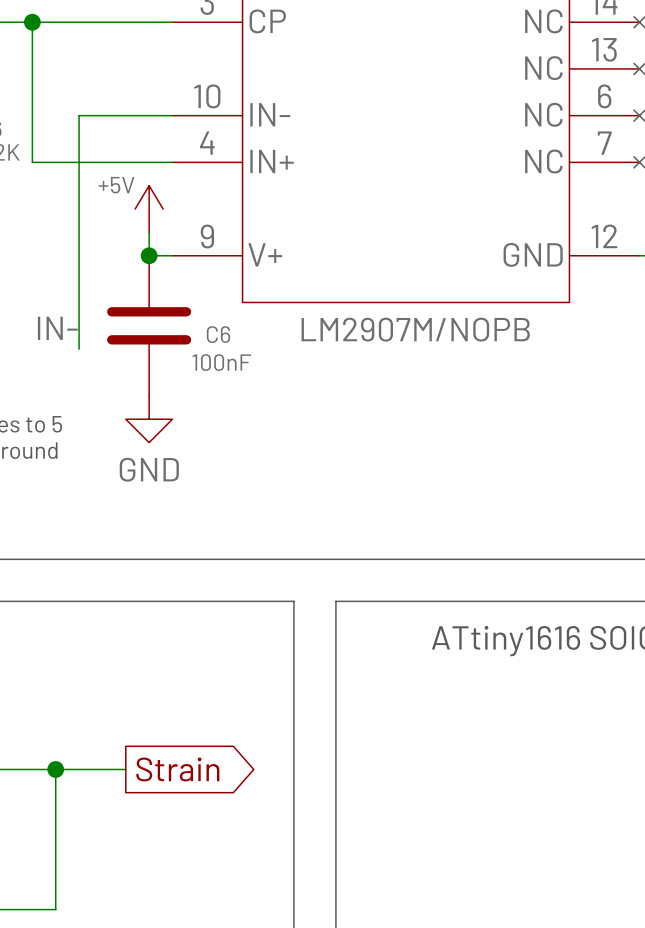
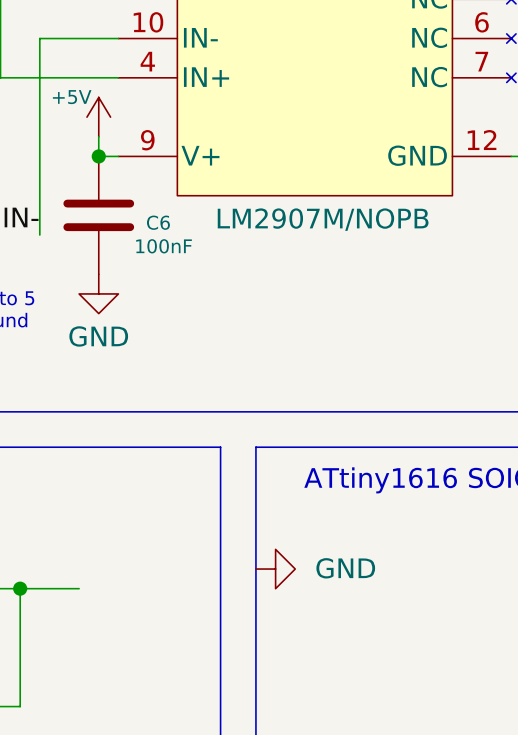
power symbol: none -> GND (275, 569)
global label: Strain (177, 769) -> none

